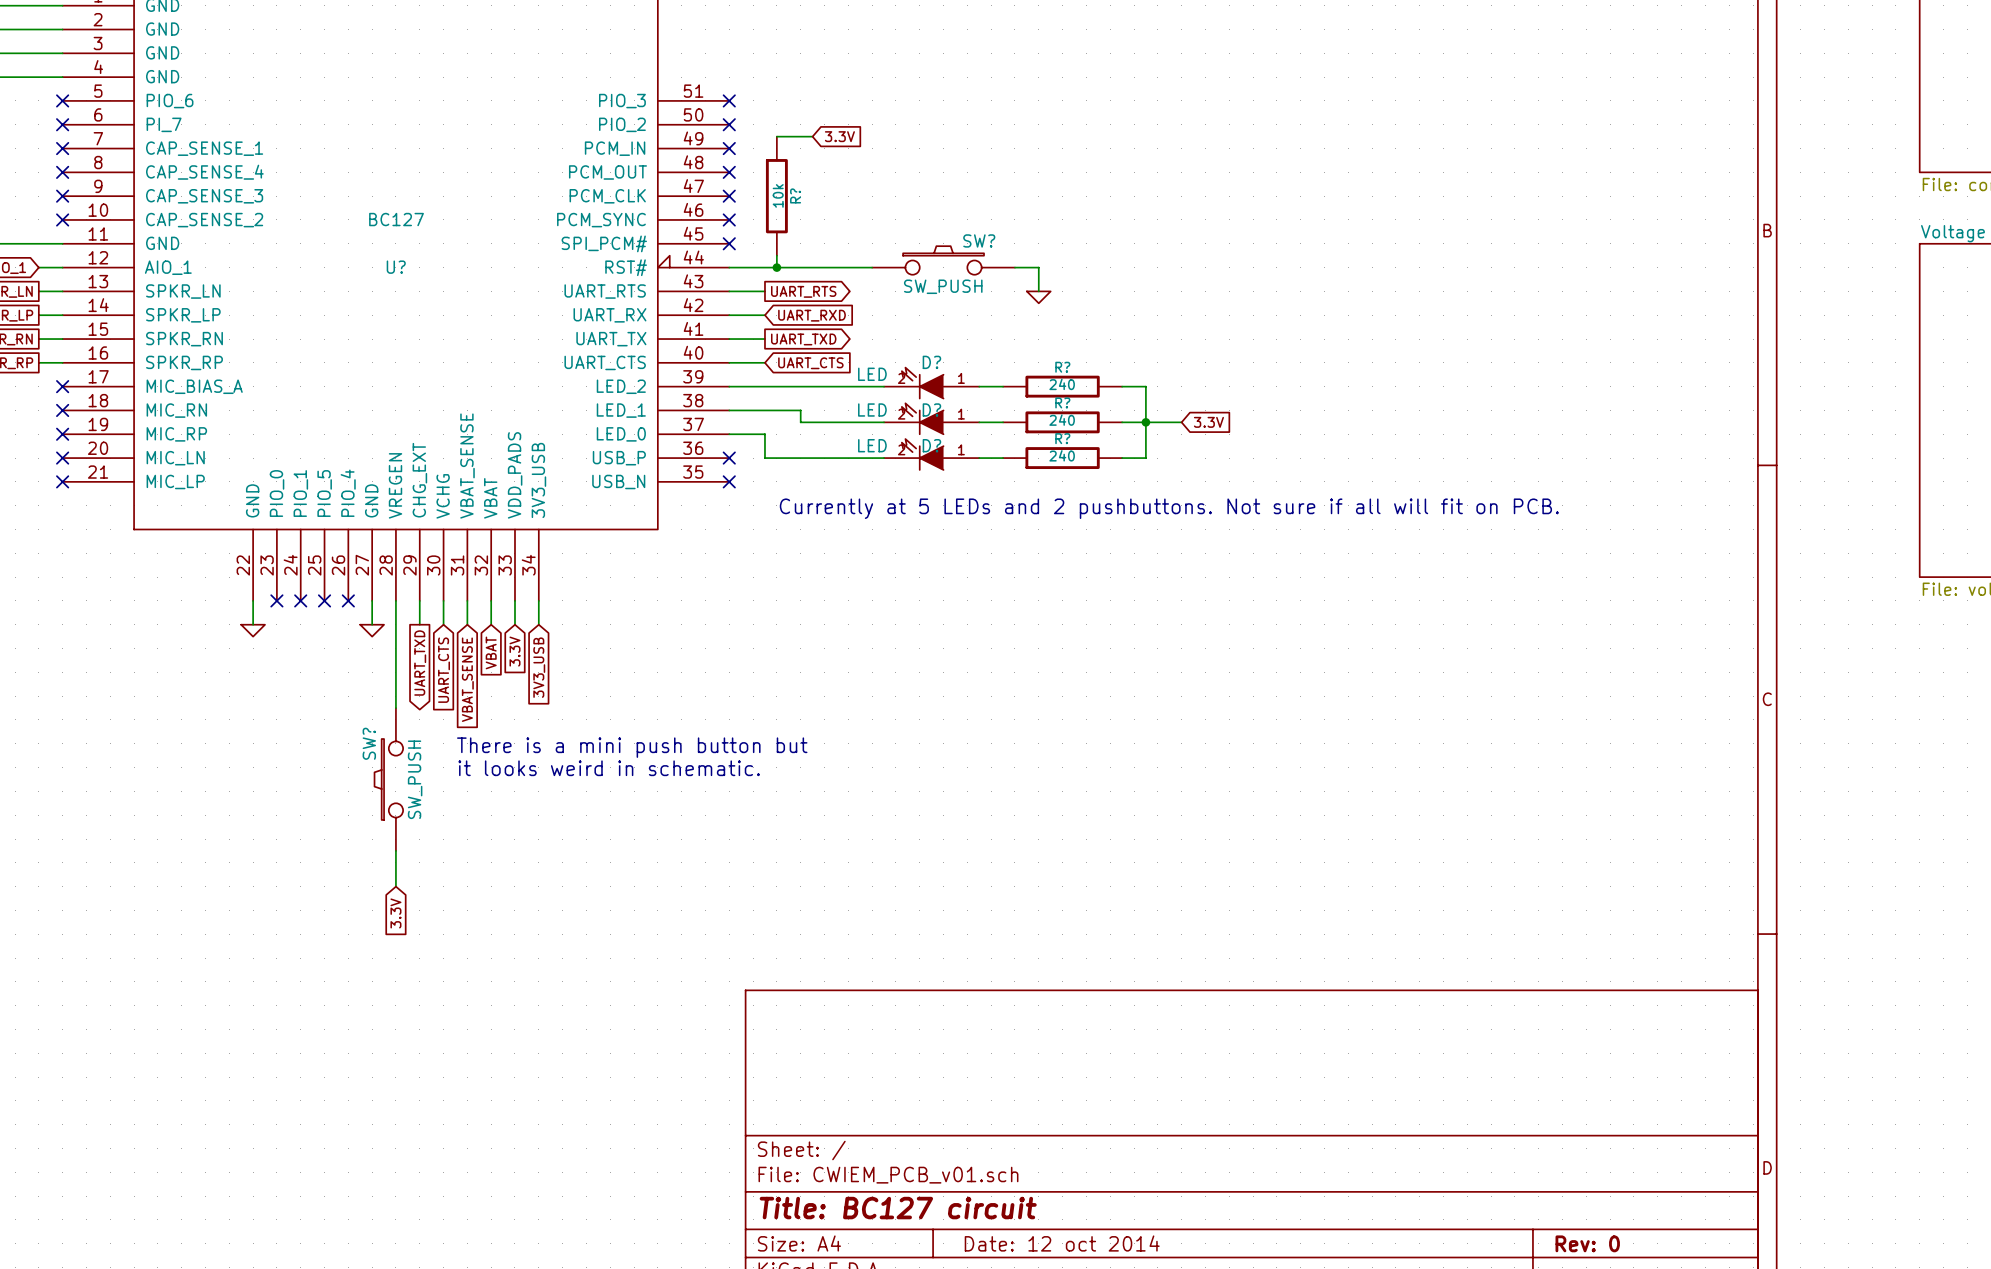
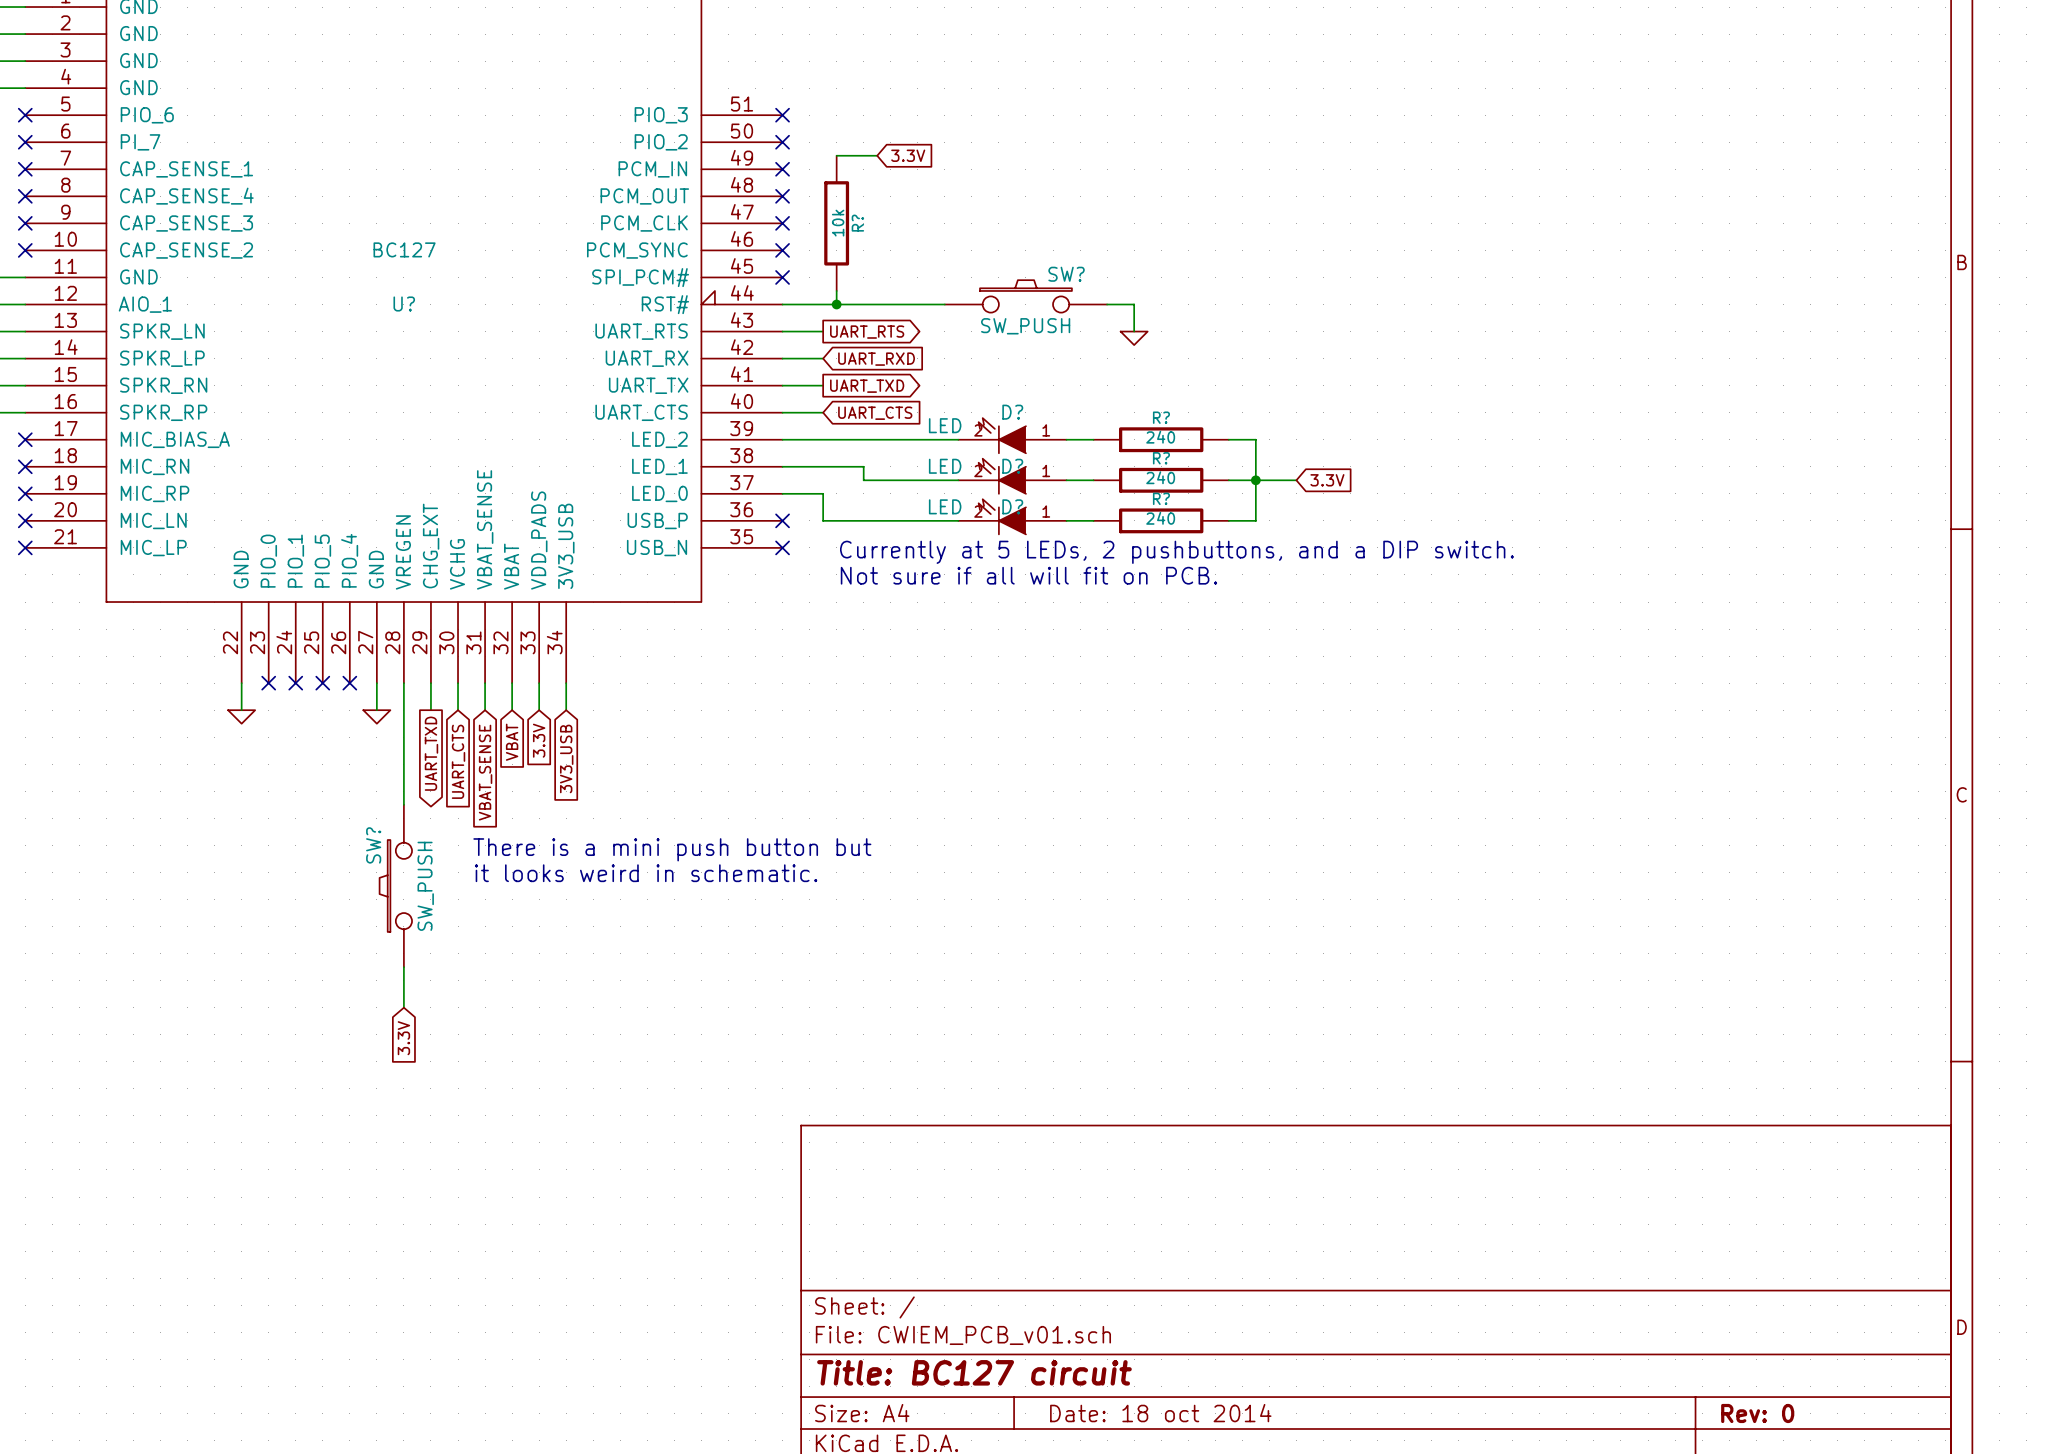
text: none -> Currently at 5 LEDs, 2 pushbuttons, and a DIP switch. (1176, 552)
text: Currently at 5 LEDs and 2 pushbuttons. Not sure if all will fit on PCB. (1169, 508) -> Not sure if all will fit on PCB. (1028, 575)
title block: Date: 12 oct 2014 (1062, 1243) -> Date: 18 oct 2014 (1160, 1413)

